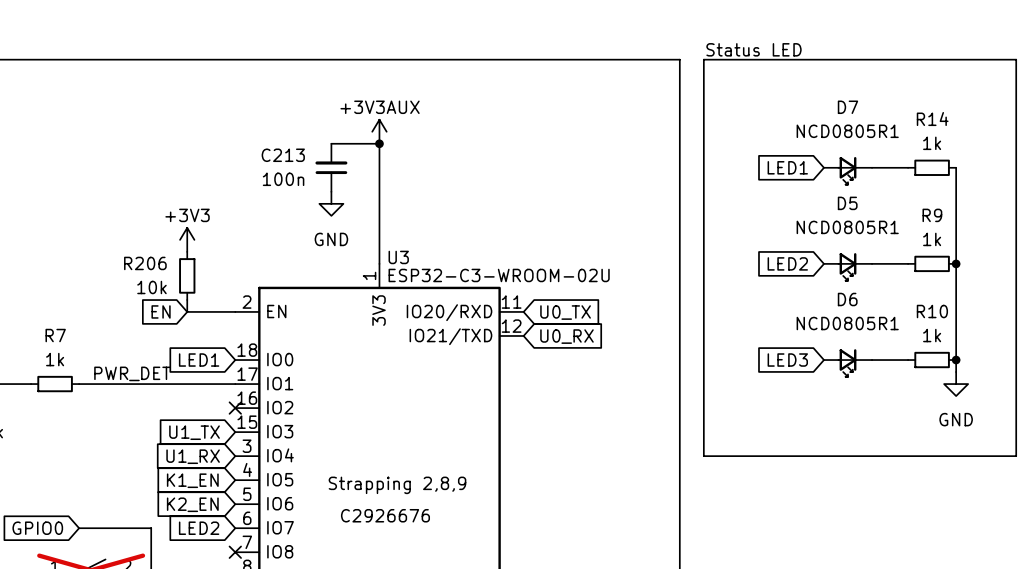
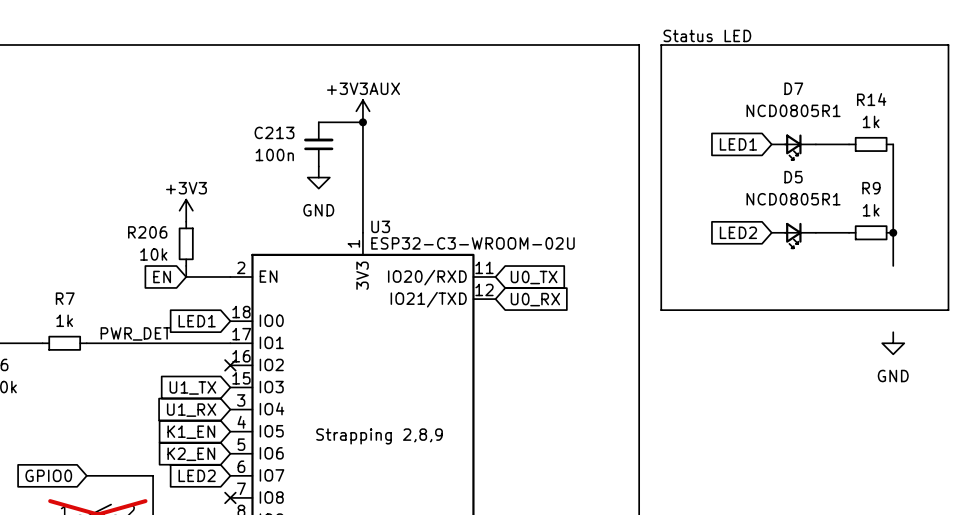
wire: (956, 299) (956, 372) -> none
line: (703, 348) (703, 456) (1016, 456) (1016, 348) -> (661, 310) (948, 310)
global label: LED3 (787, 360) -> none
wire: (872, 360) (908, 360) -> none
R10: 1k (932, 360) -> none
junction: (956, 360) -> none
D6: NCD0805R1 (848, 363) -> none
U3 text: C2926676 (385, 515) -> none

